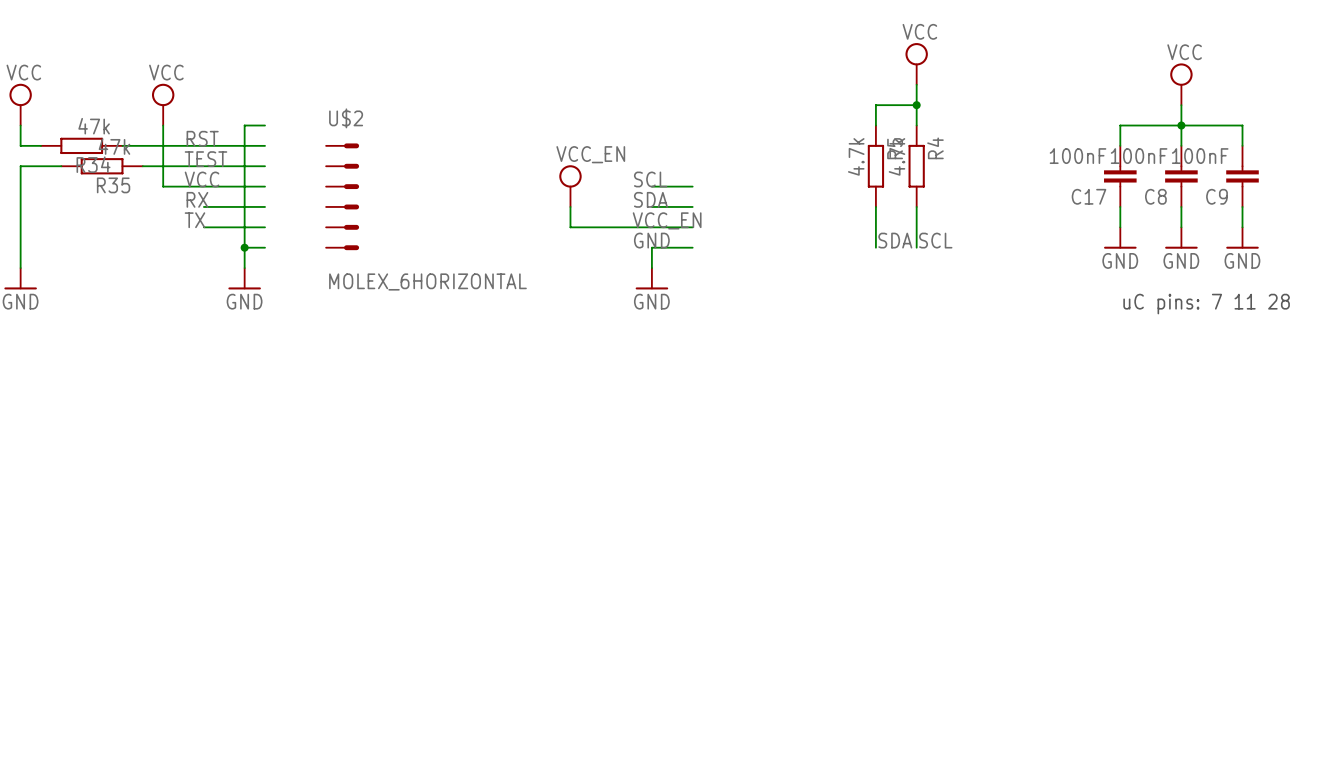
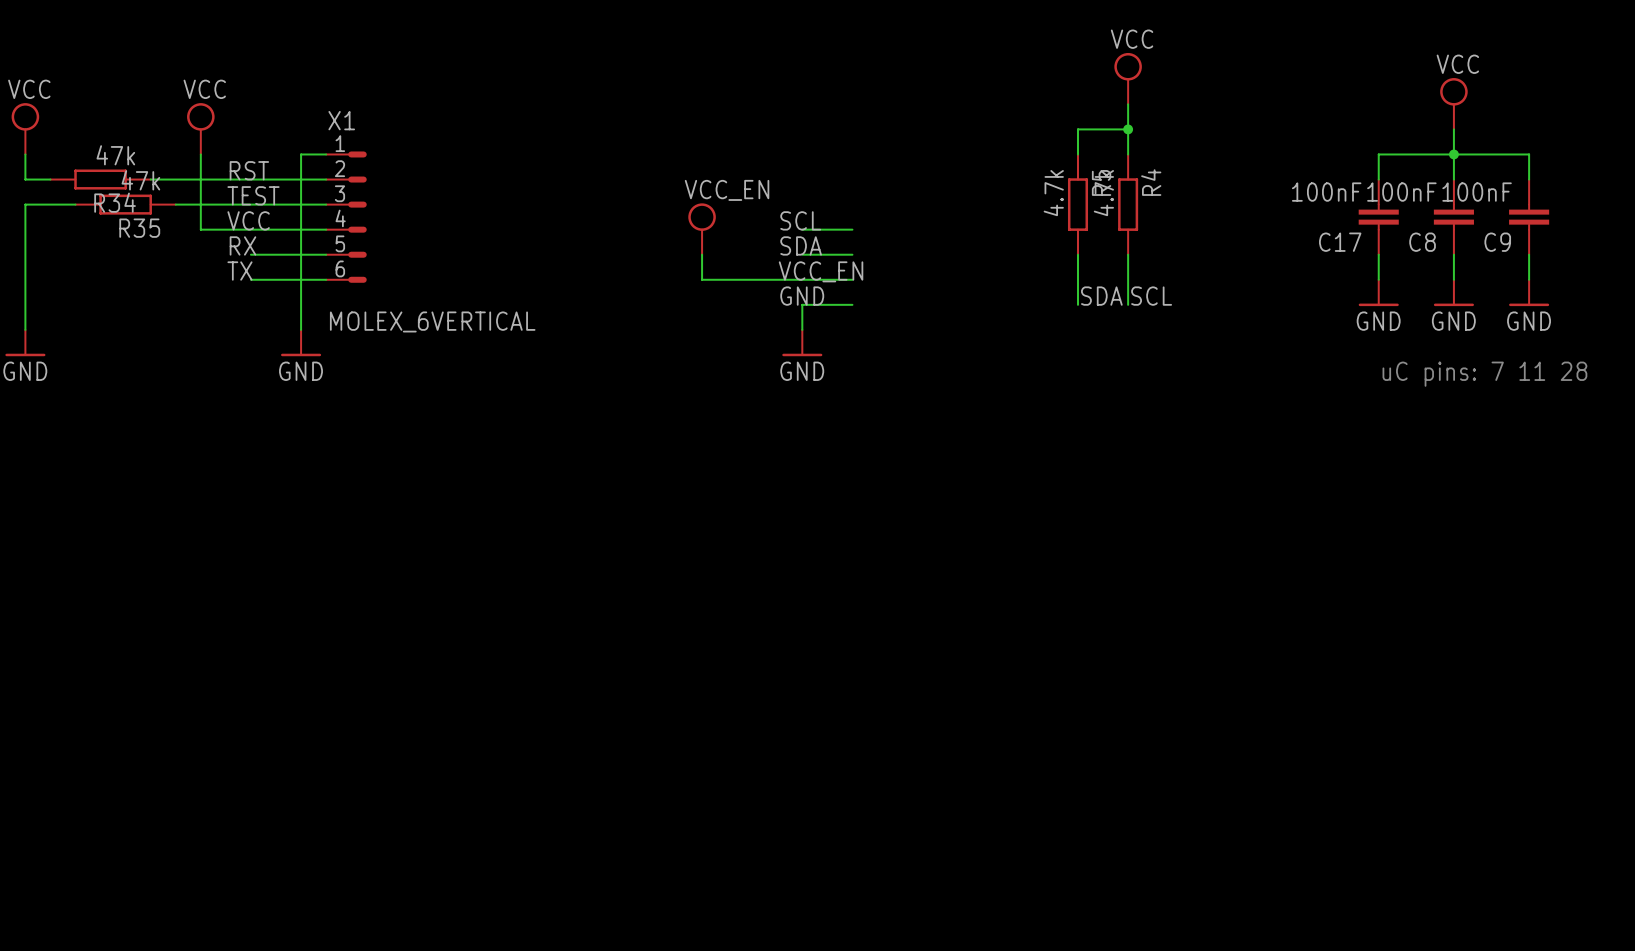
X1: none -> MOLEX_6VERTICAL (346, 217)
U$2: MOLEX_6HORIZONTAL (342, 196) -> none
wire: (244, 247) (265, 247) -> none
junction: (244, 247) -> none

